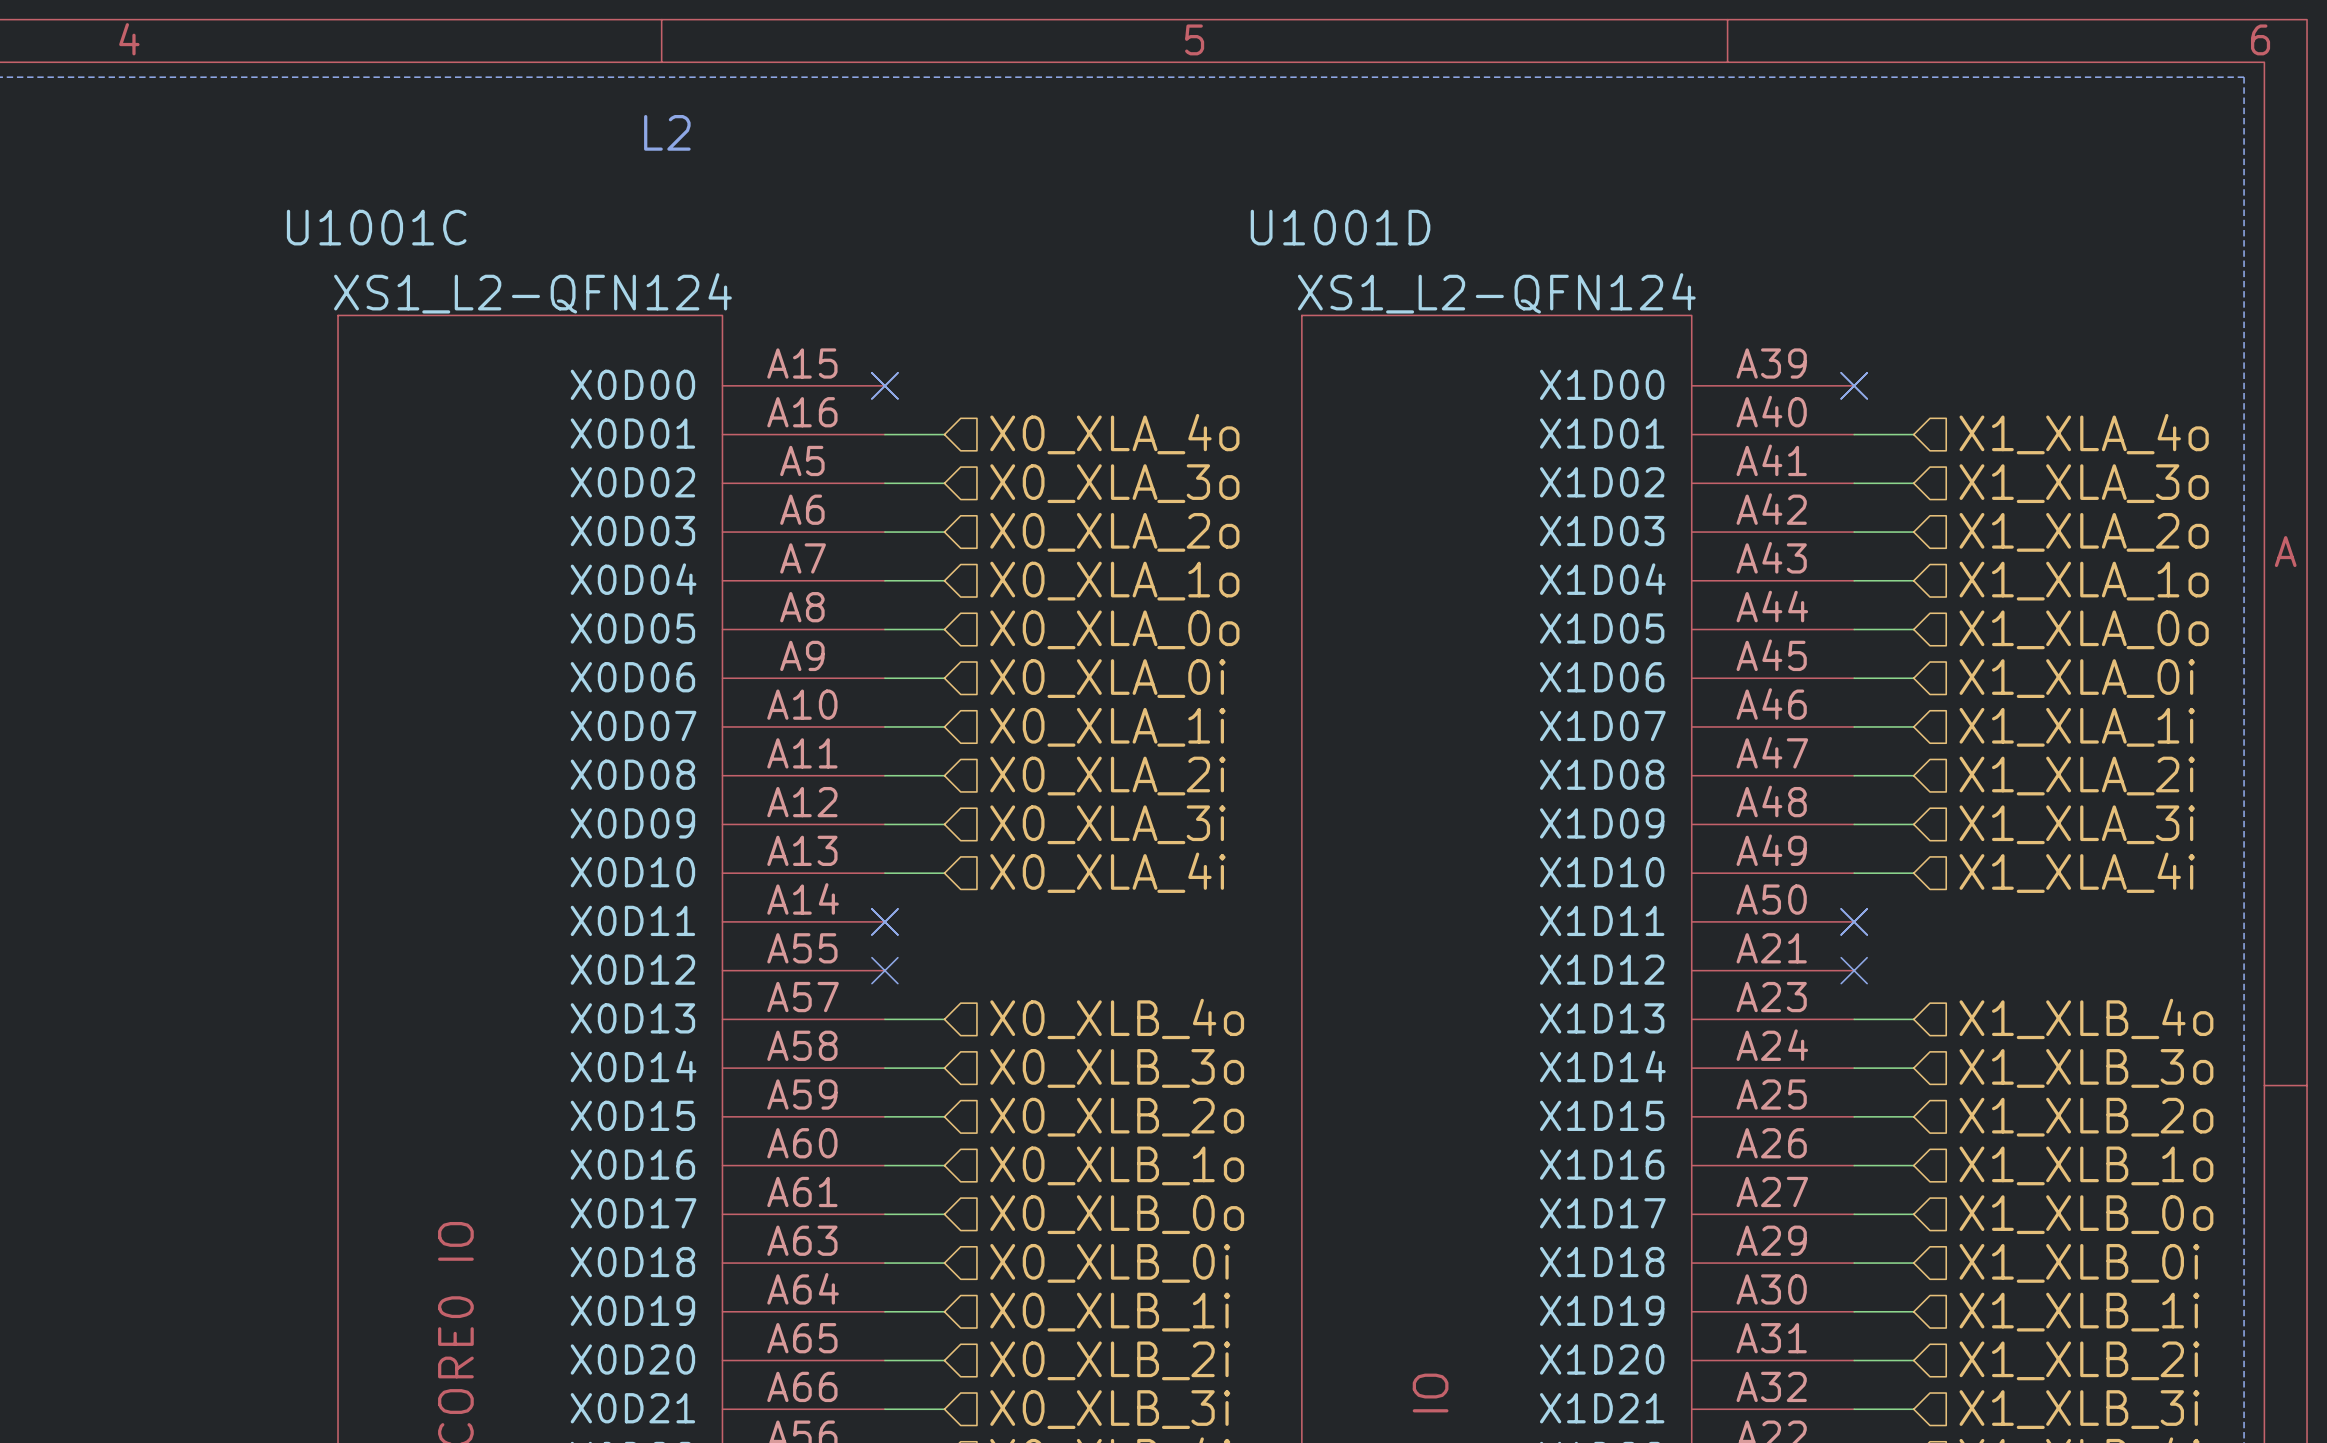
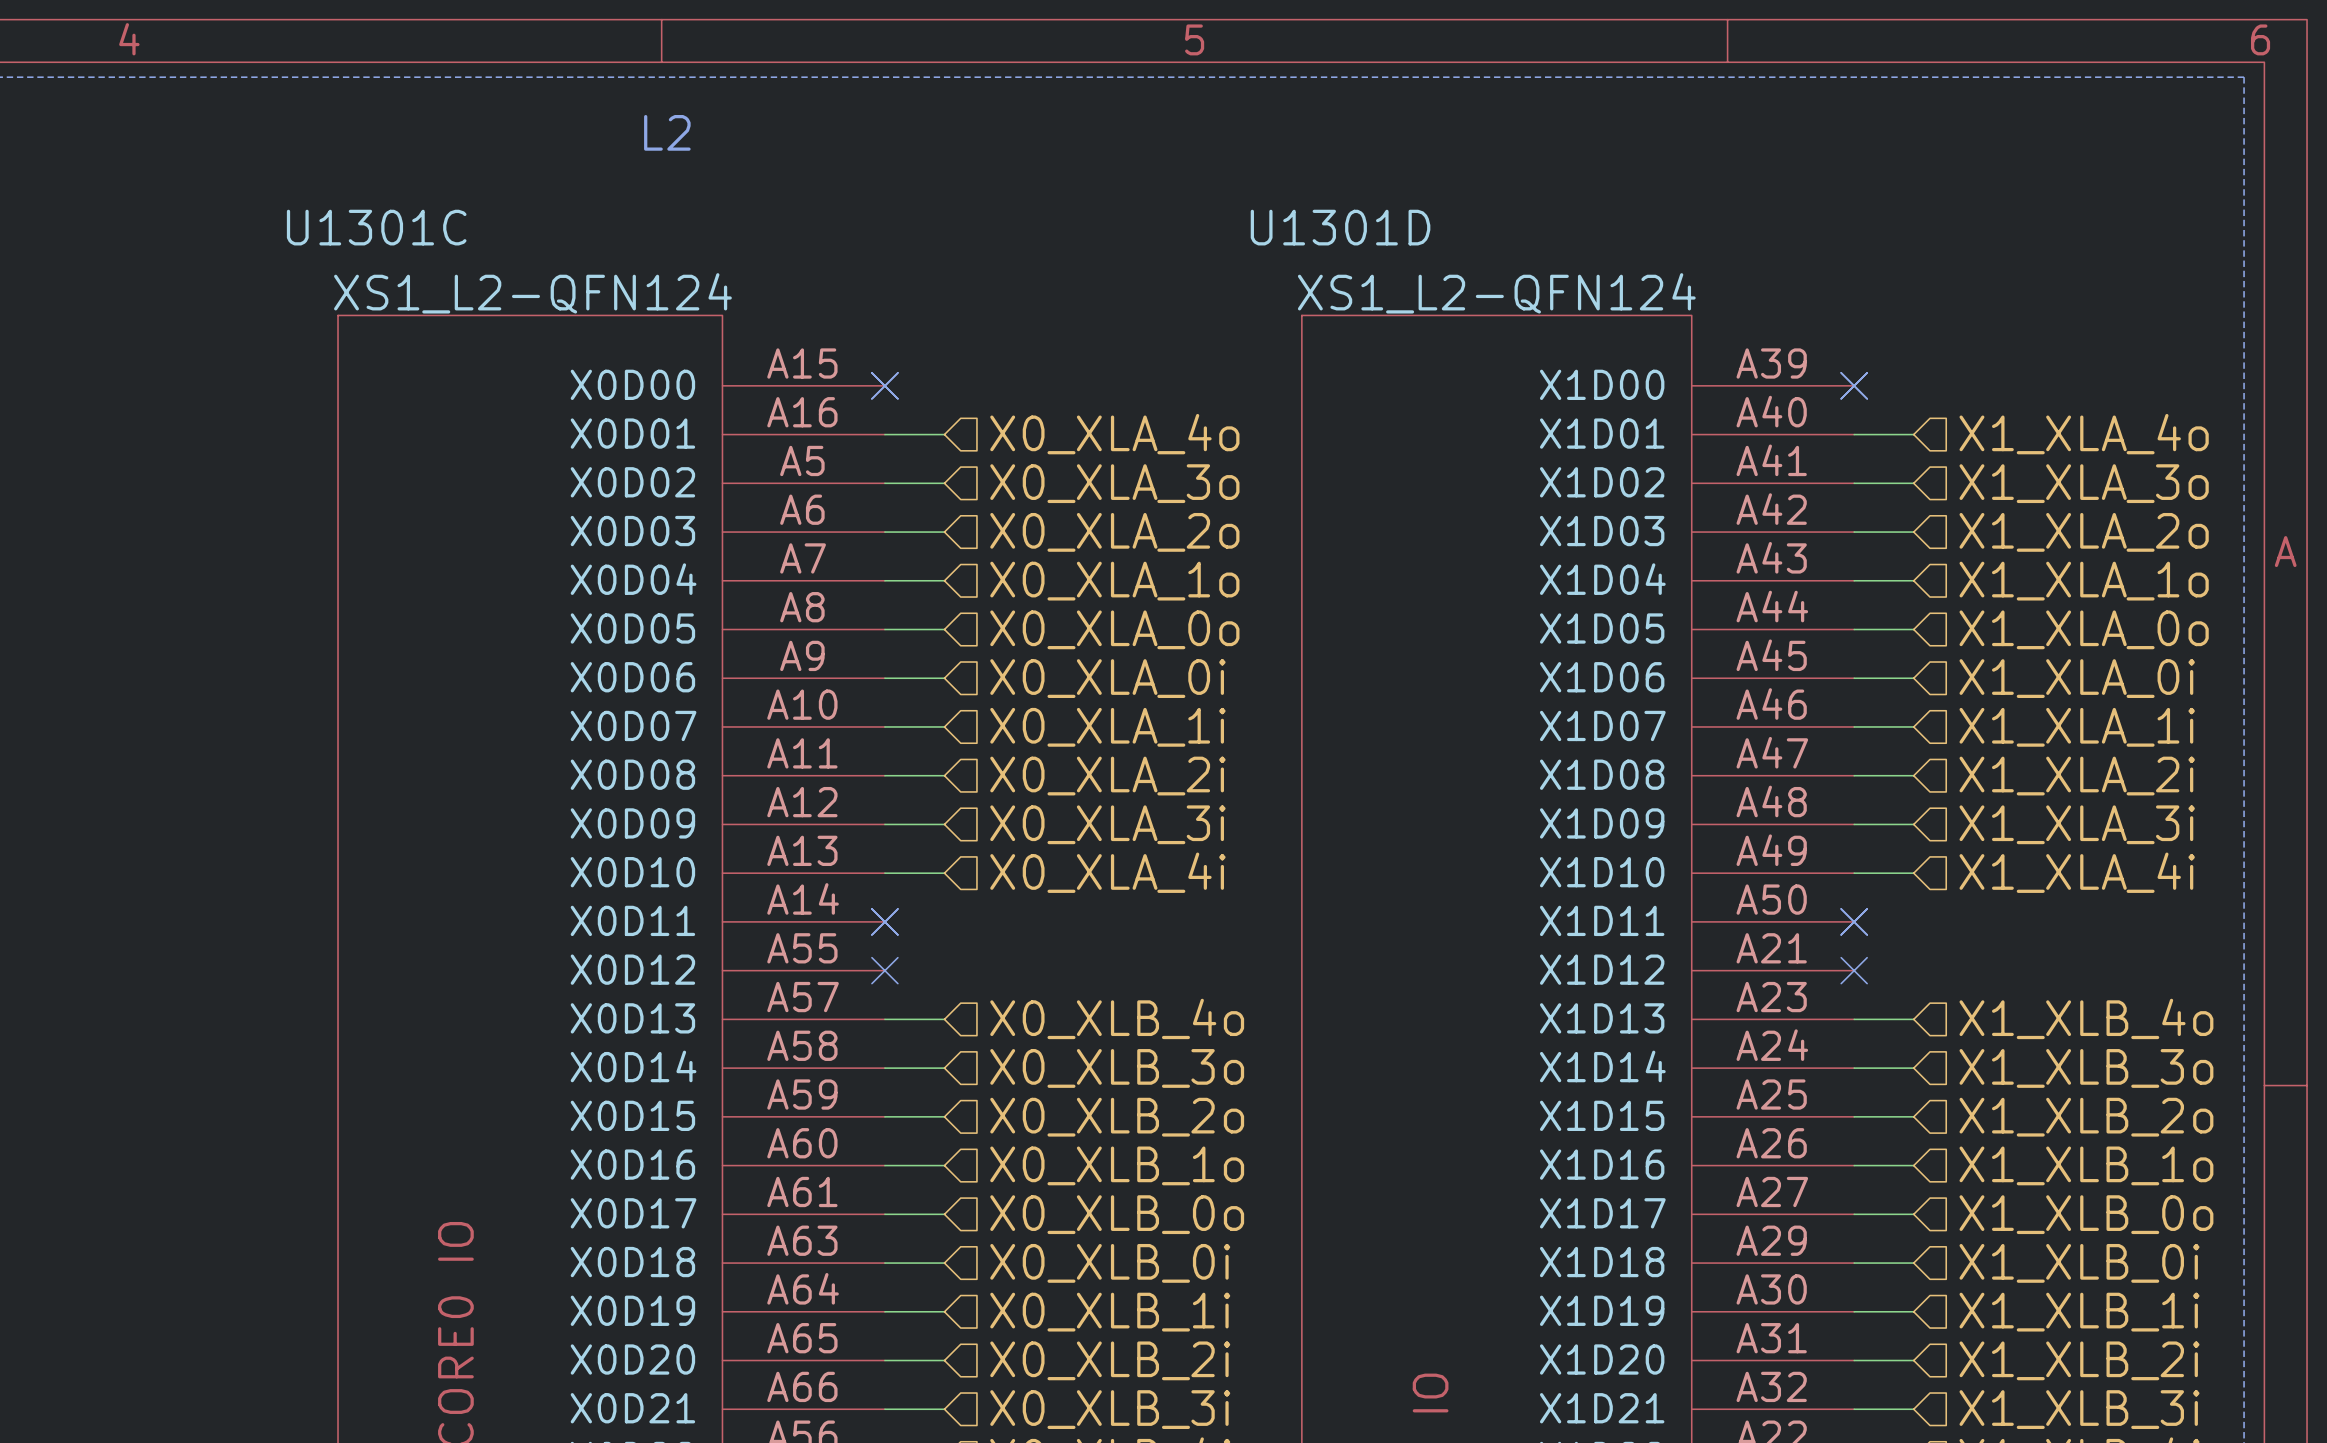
U1001C name: U1001C (376, 227) -> U1301C (376, 227)
U1001D name: U1001D (1340, 227) -> U1301D (1340, 227)

